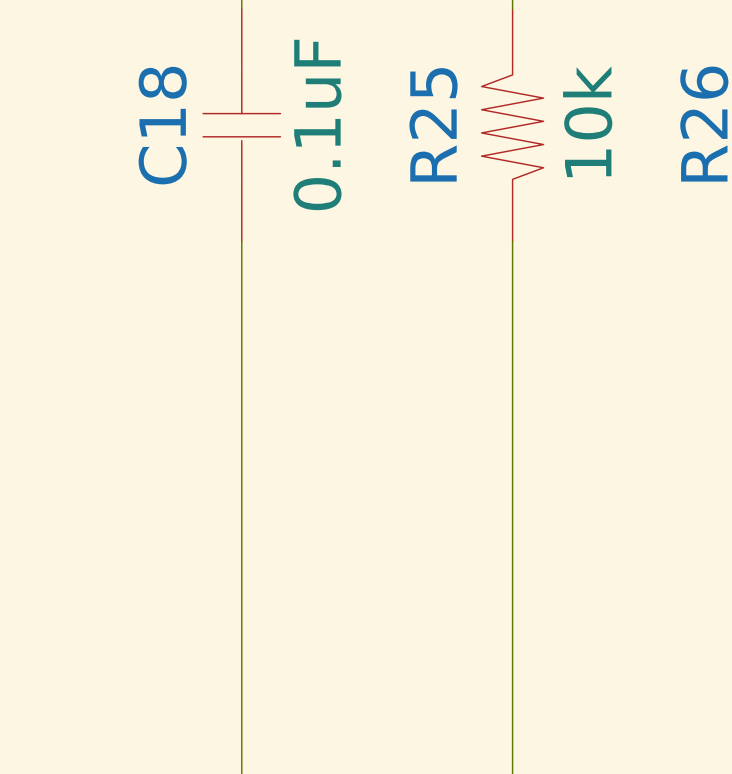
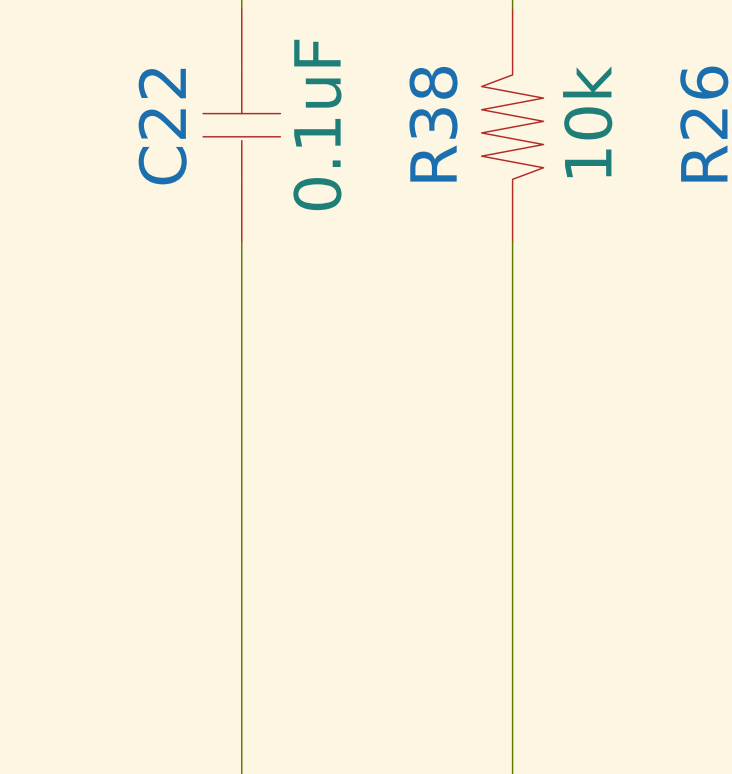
R25 name: R25 (433, 124) -> R38 (433, 124)
C18 name: C18 (162, 125) -> C22 (162, 126)

